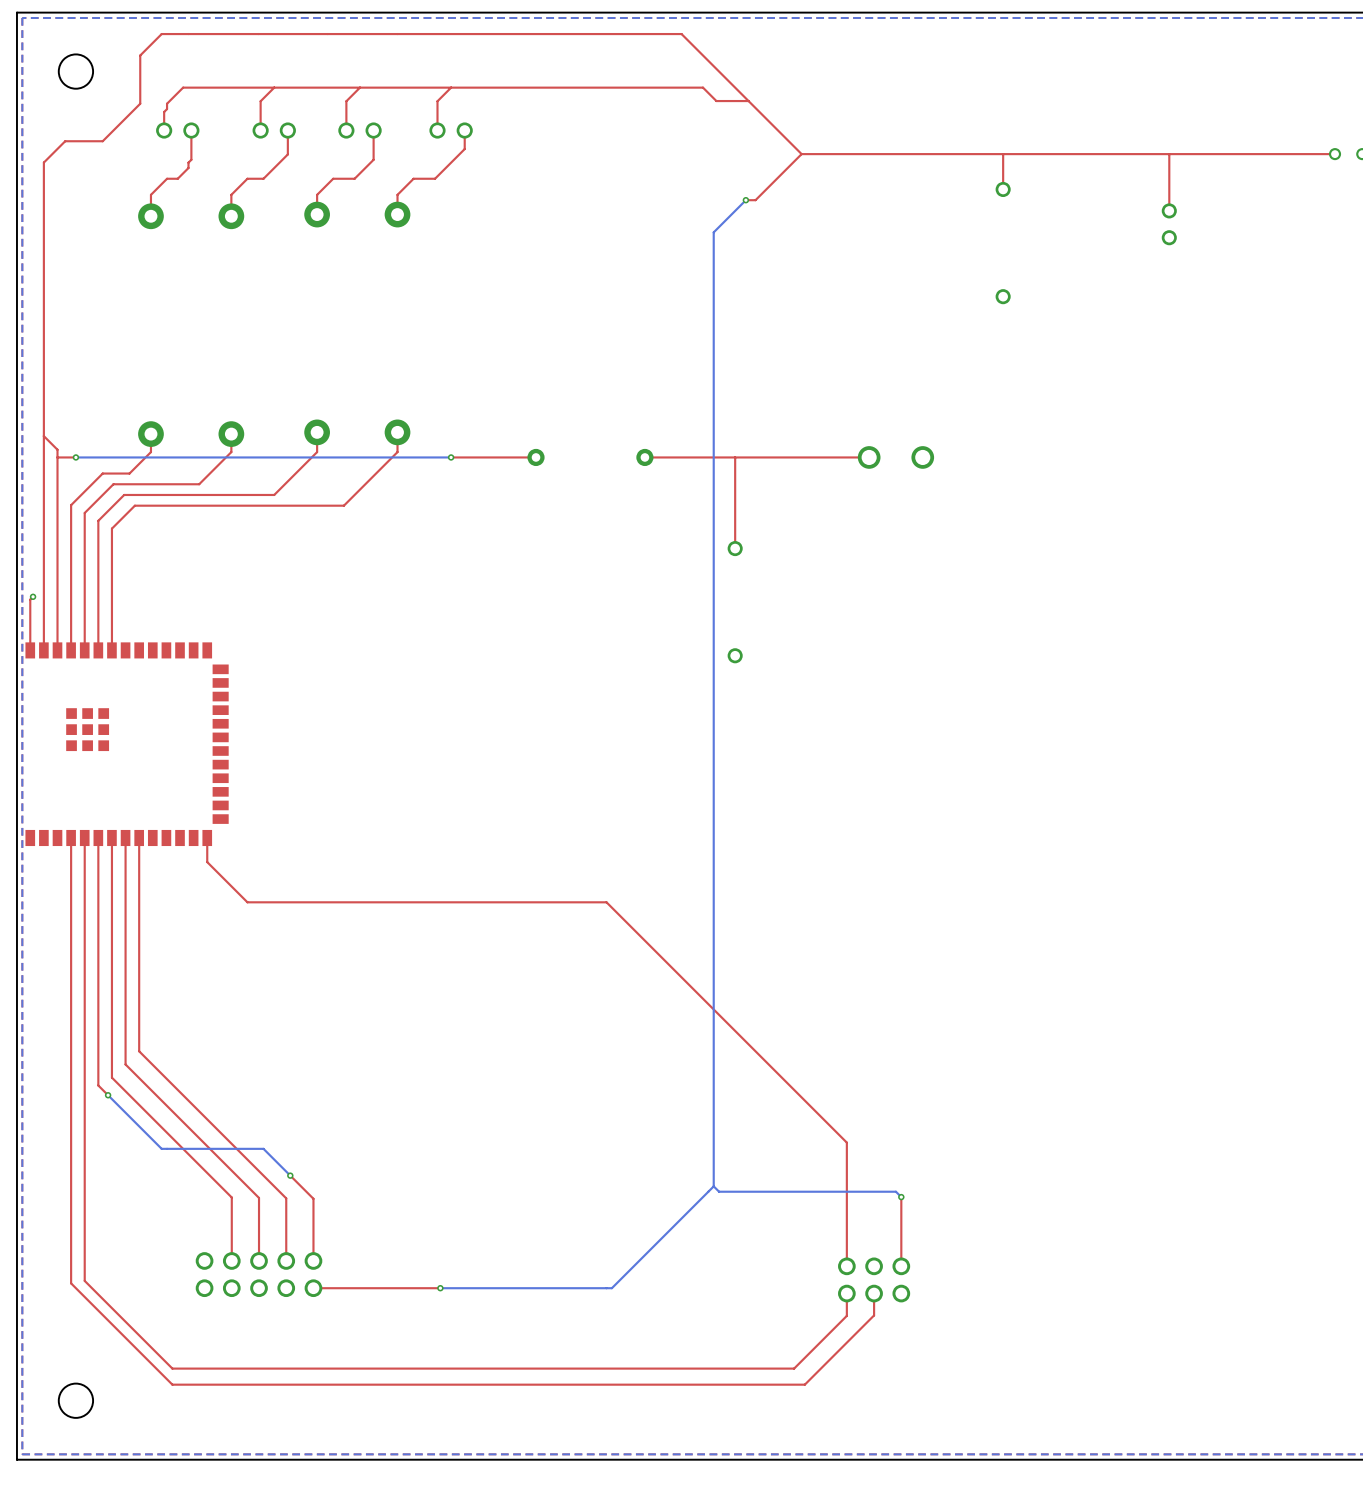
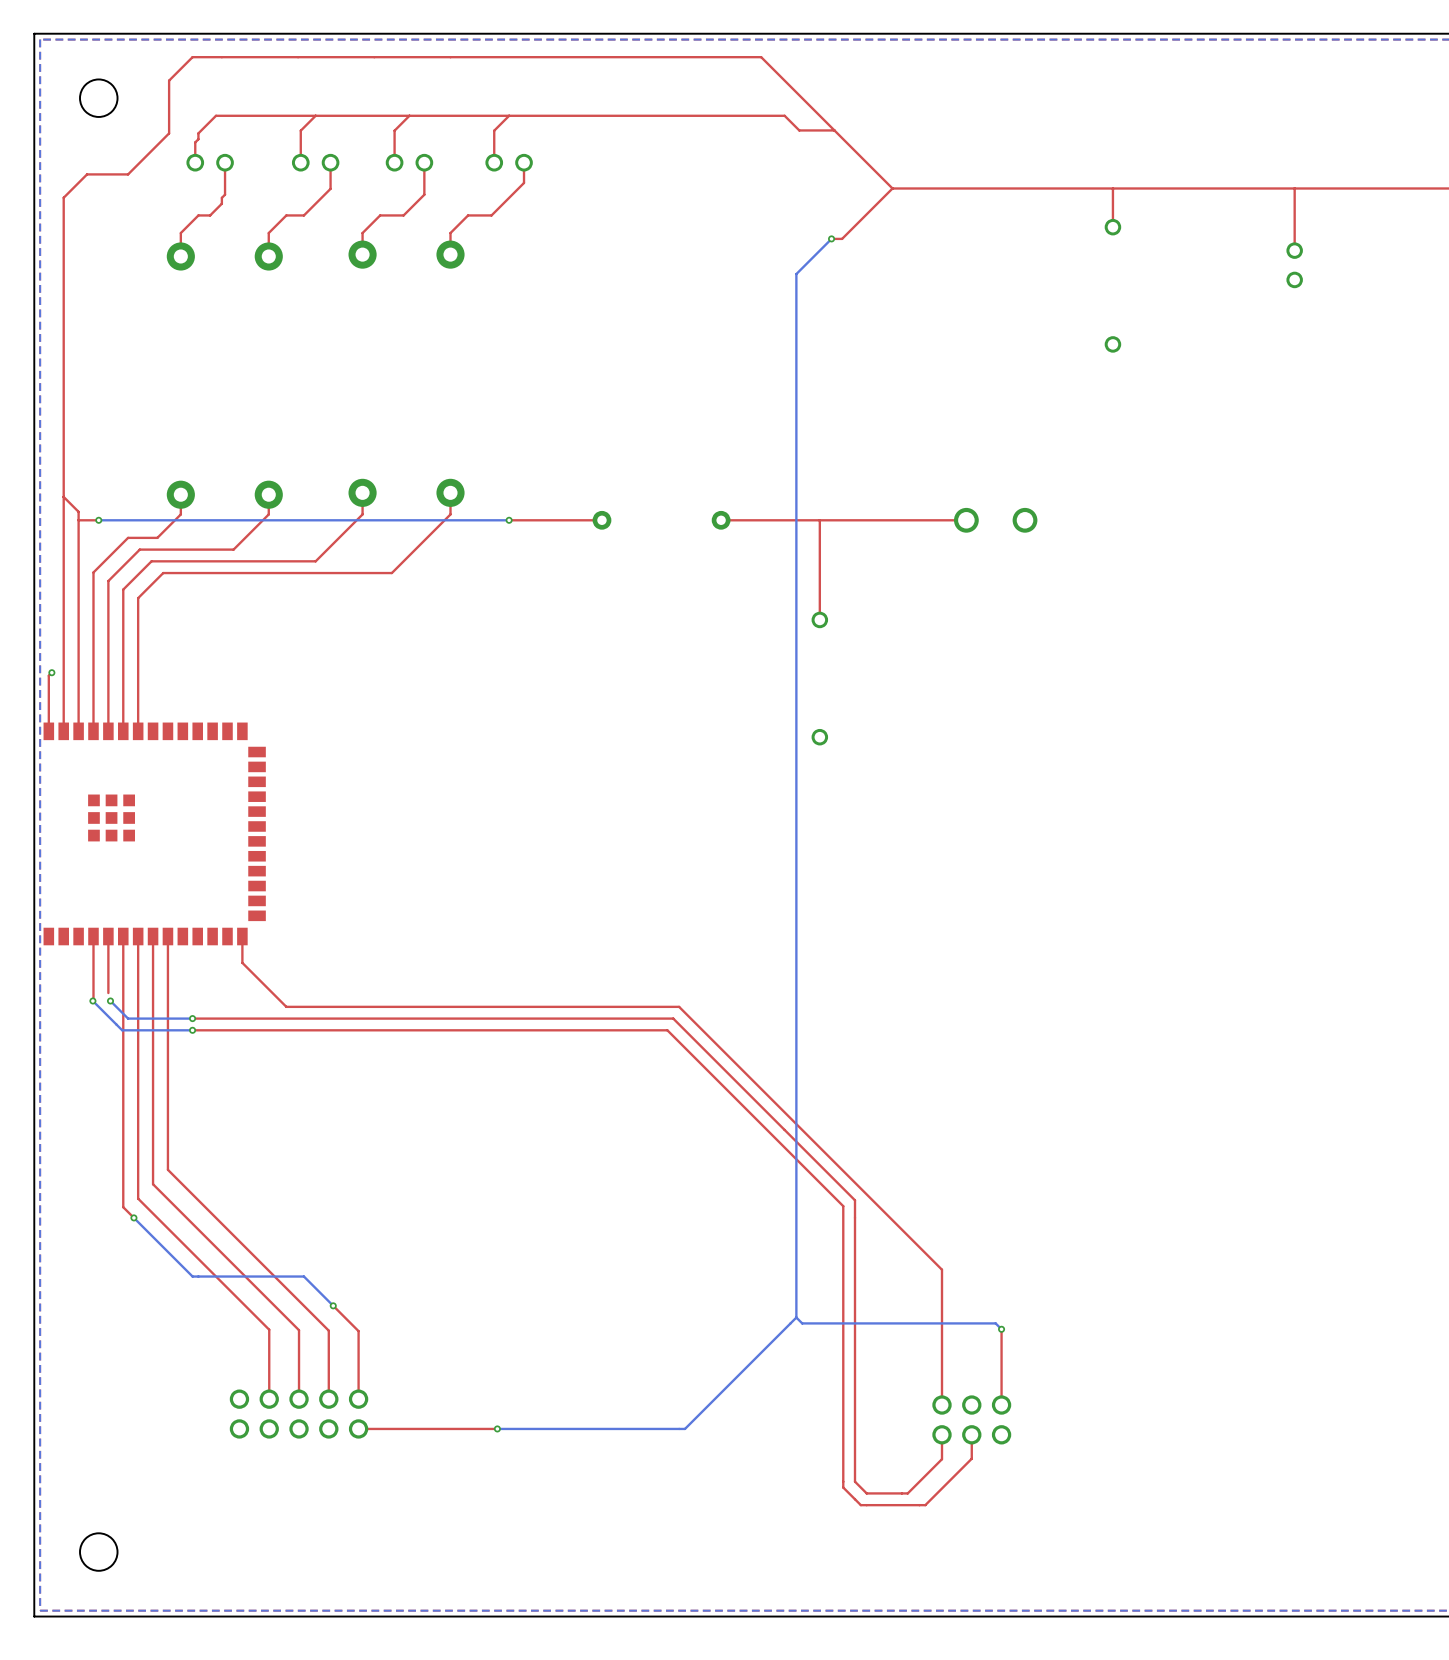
top track: (84, 889) (84, 1280) (172, 1368) (794, 1368) (815, 1347) -> (192, 1018) (673, 1018) (855, 1200) (855, 1481) (866, 1493) (907, 1493)
bottom track: none -> (92, 1001) (122, 1030) (192, 1030)
via: none -> (92, 1001)
top track: (71, 896) (71, 1283) (172, 1384) (804, 1384) (831, 1357) -> (192, 1030) (667, 1030) (843, 1206) (843, 1487) (860, 1505) (925, 1505)
bottom track: none -> (110, 1001) (128, 1018) (192, 1018)
via: none -> (110, 1001)
via: none -> (192, 1018)
via: none -> (192, 1030)

